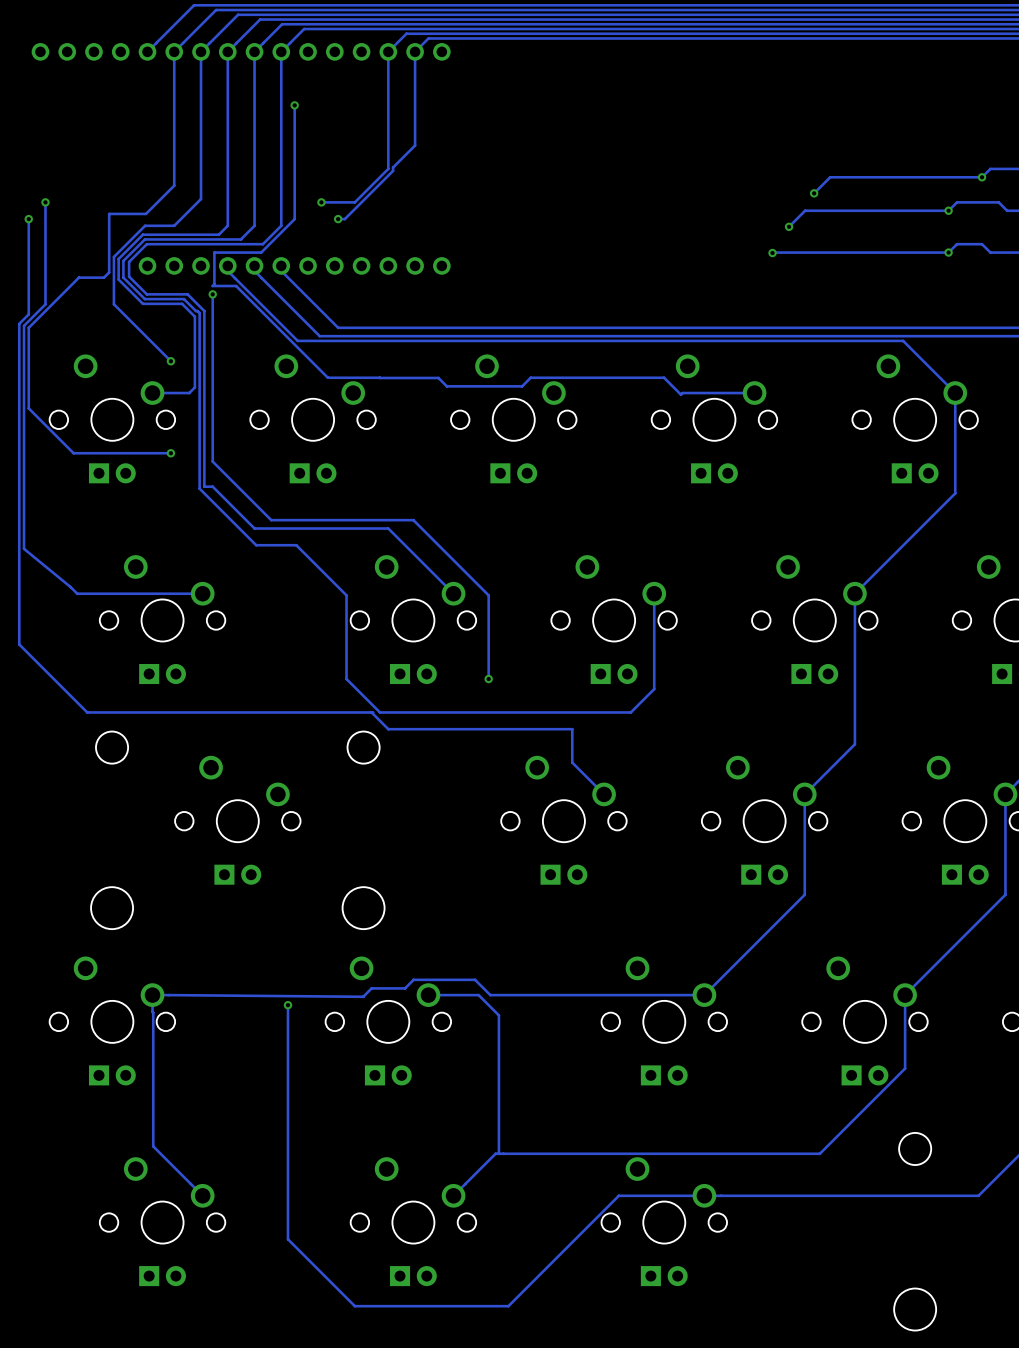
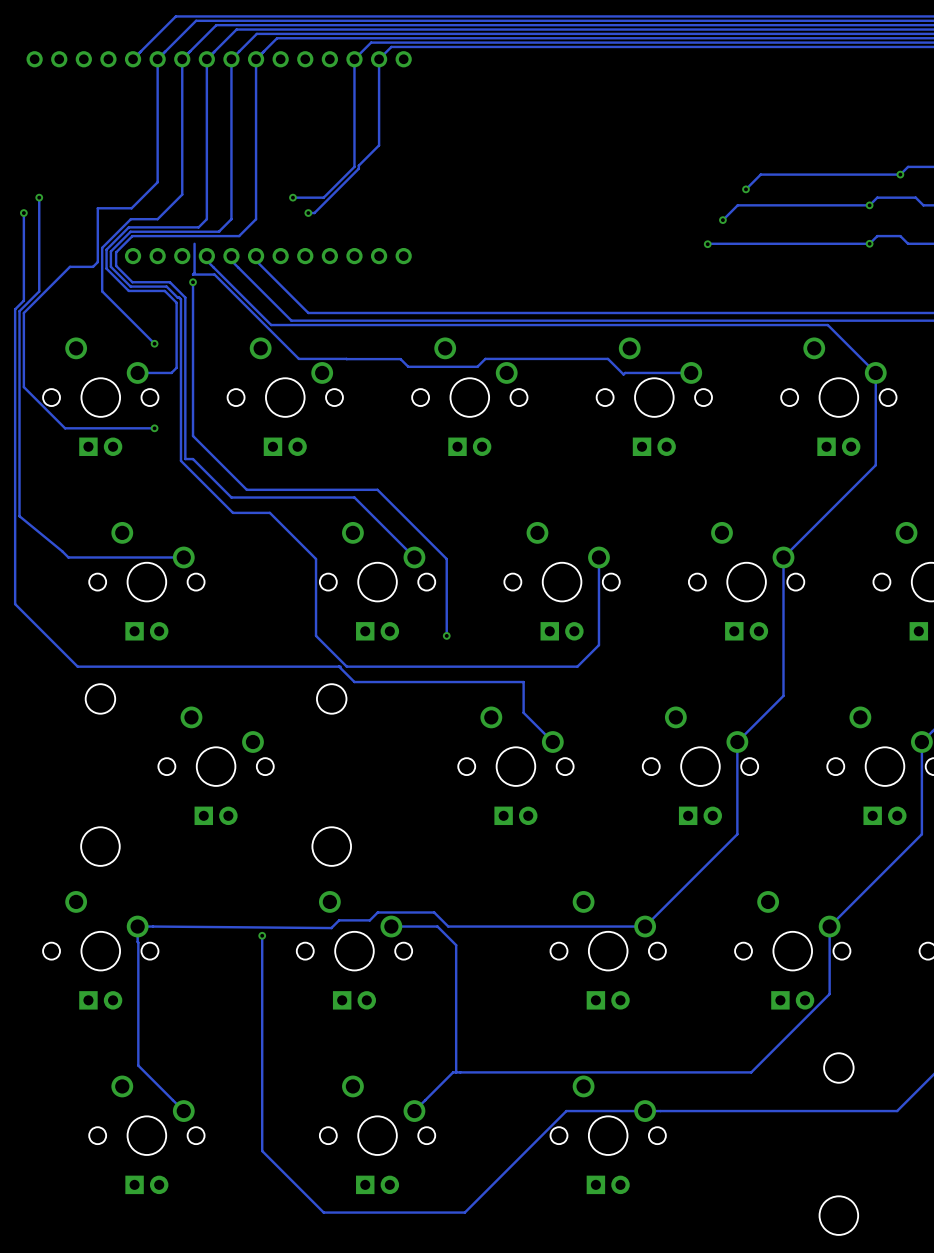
track: (294, 105) (294, 219) (261, 252) (214, 252) -> none
via: (294, 105) -> none

